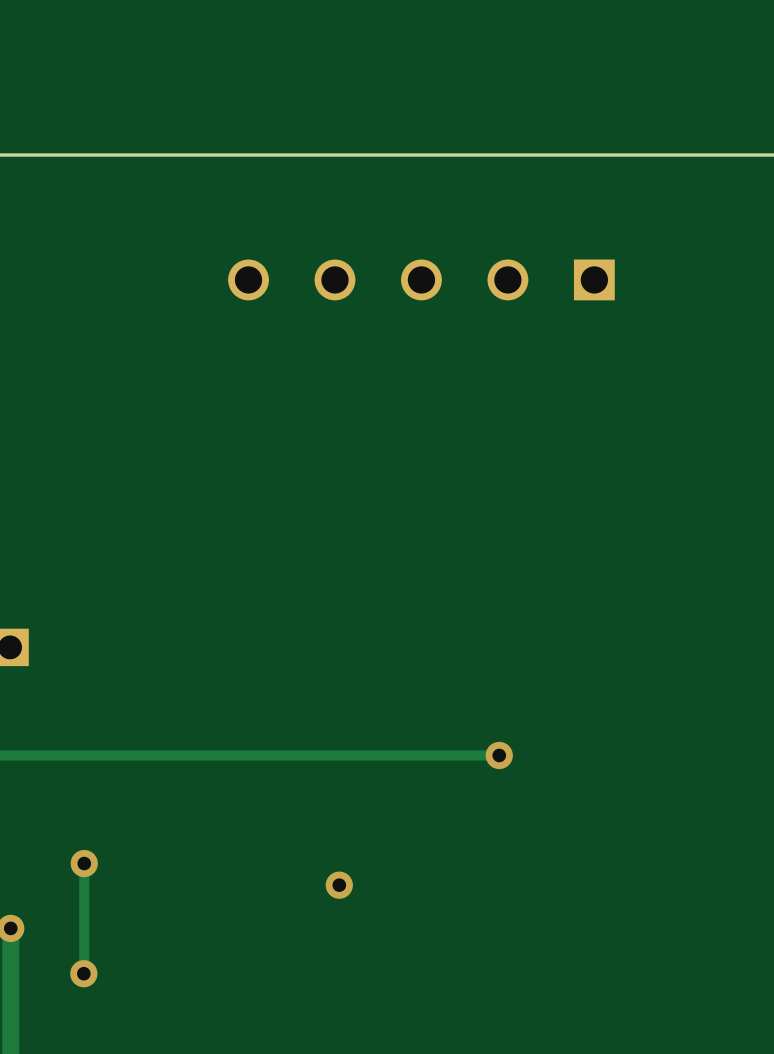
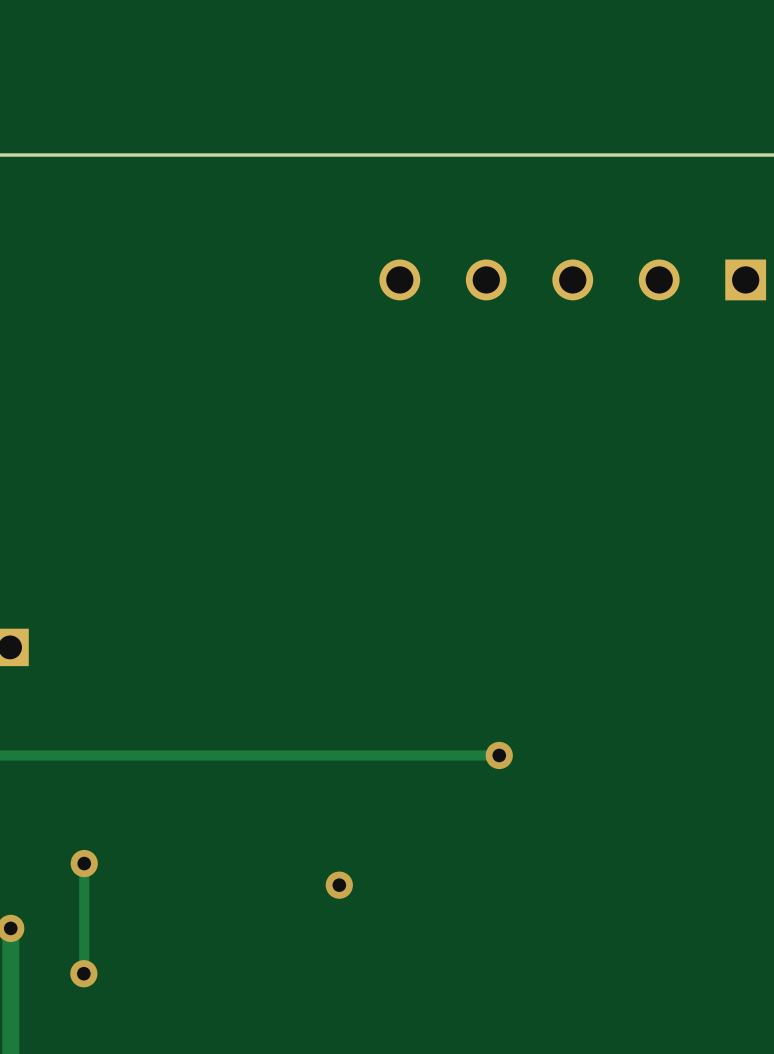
part position: (421, 279) -> (572, 279)

